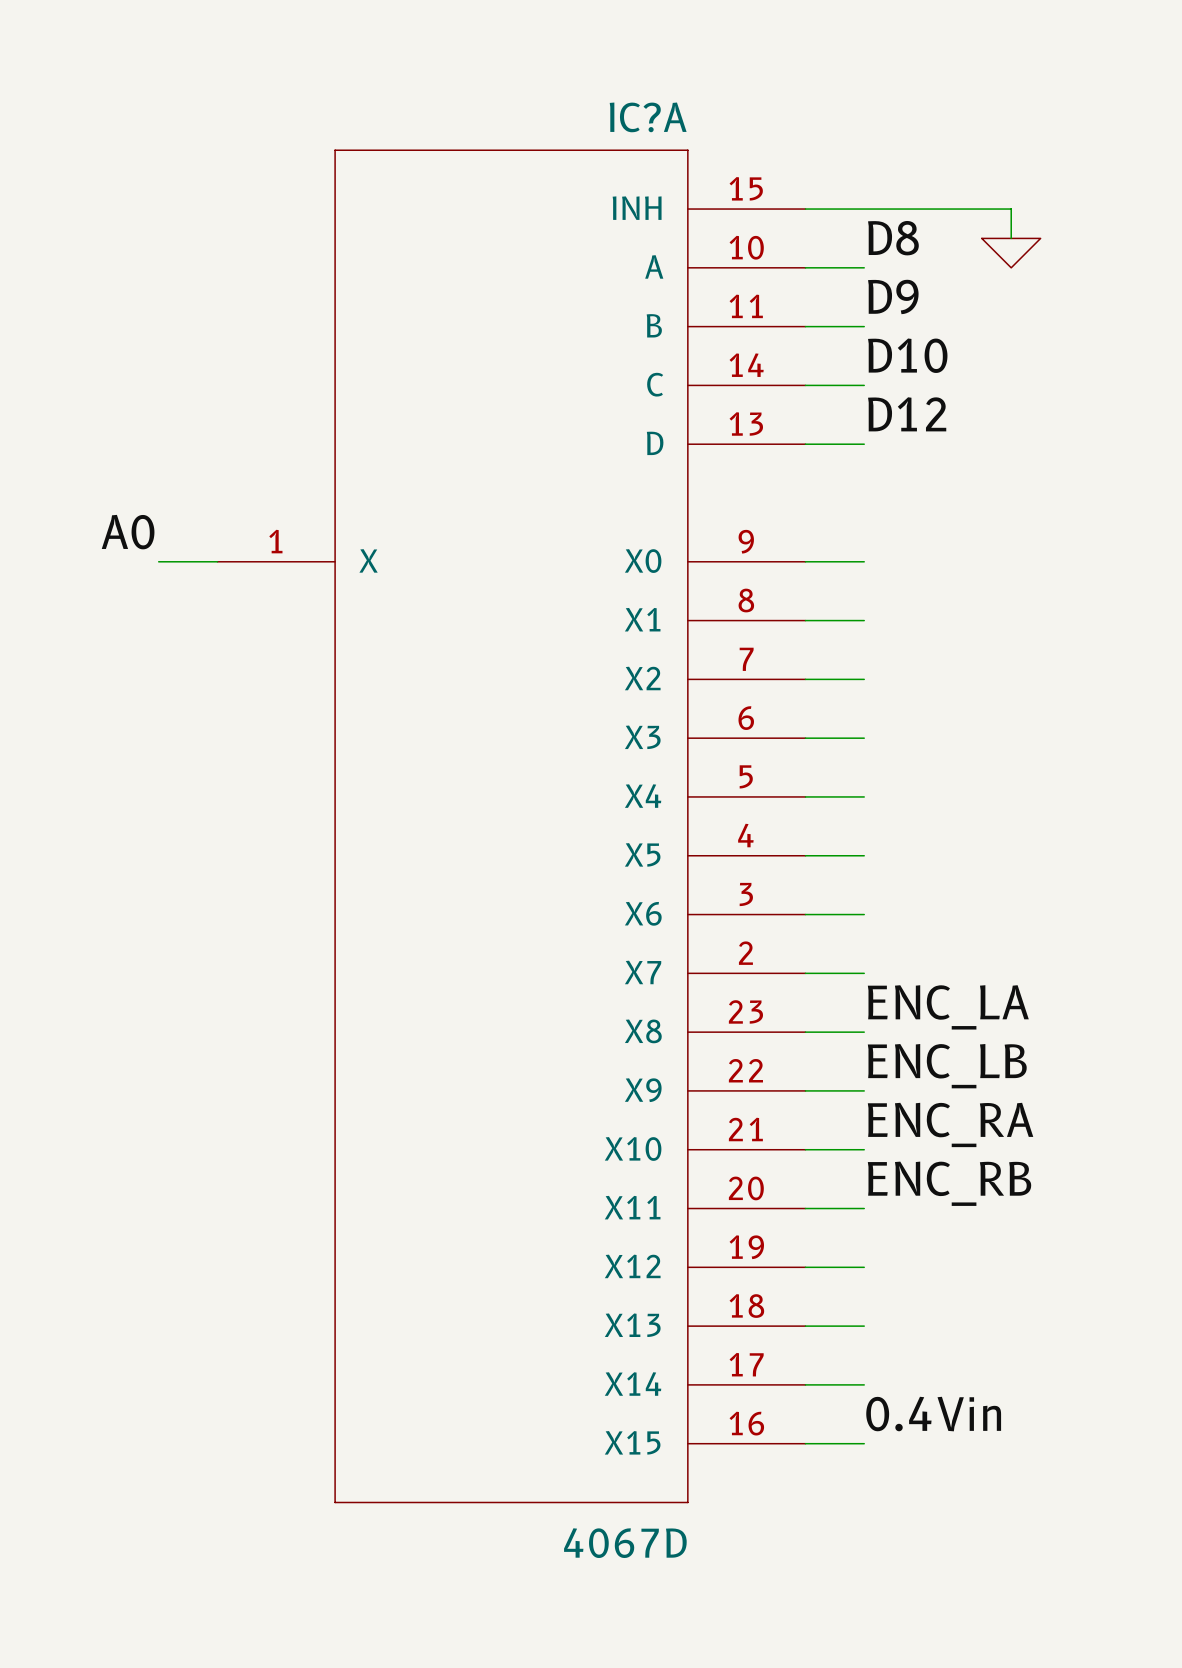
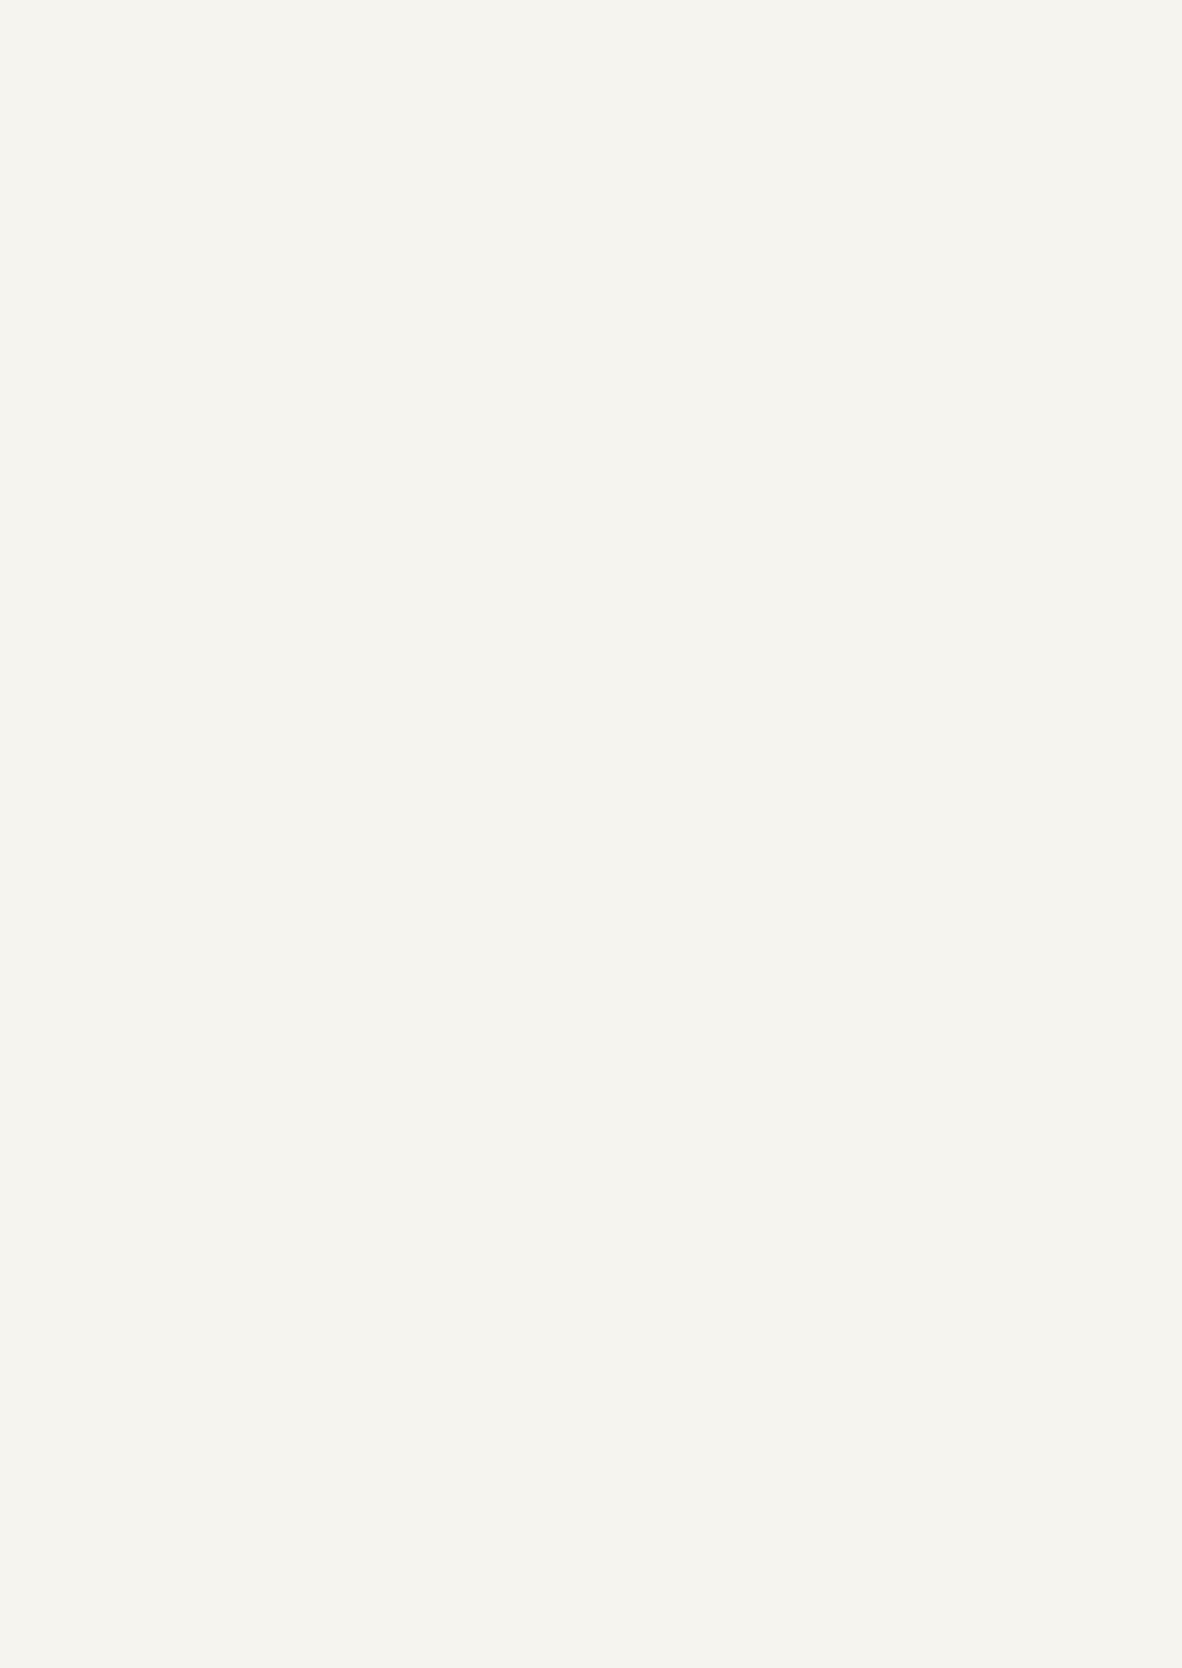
wire: (805, 209) (1011, 209) (1011, 238) -> none
label: D8 (893, 238) -> none
power symbol: (1011, 253) -> none
wire: (805, 267) (864, 267) -> none
label: D9 (893, 296) -> none
wire: (805, 326) (864, 326) -> none
label: D10 (907, 355) -> none
wire: (805, 385) (864, 385) -> none
label: D12 (907, 414) -> none
wire: (805, 444) (864, 444) -> none
label: A0 (128, 532) -> none
wire: (158, 561) (217, 561) -> none
wire: (805, 561) (864, 561) -> none
wire: (805, 620) (864, 620) -> none
wire: (805, 679) (864, 679) -> none
wire: (805, 738) (864, 738) -> none
wire: (805, 796) (864, 796) -> none
IC?A: 4067D (511, 826) -> none
wire: (805, 855) (864, 855) -> none
wire: (805, 914) (864, 914) -> none
wire: (805, 973) (864, 973) -> none
label: ENC_LA (948, 1007) -> none
wire: (805, 1032) (864, 1032) -> none
label: ENC_LB (947, 1066) -> none
wire: (805, 1090) (864, 1090) -> none
label: ENC_RA (950, 1124) -> none
wire: (805, 1149) (864, 1149) -> none
label: ENC_RB (949, 1183) -> none
wire: (805, 1208) (864, 1208) -> none
wire: (805, 1267) (864, 1267) -> none
wire: (805, 1326) (864, 1326) -> none
wire: (805, 1384) (864, 1384) -> none
label: 0.4Vin (933, 1414) -> none
wire: (805, 1443) (864, 1443) -> none

